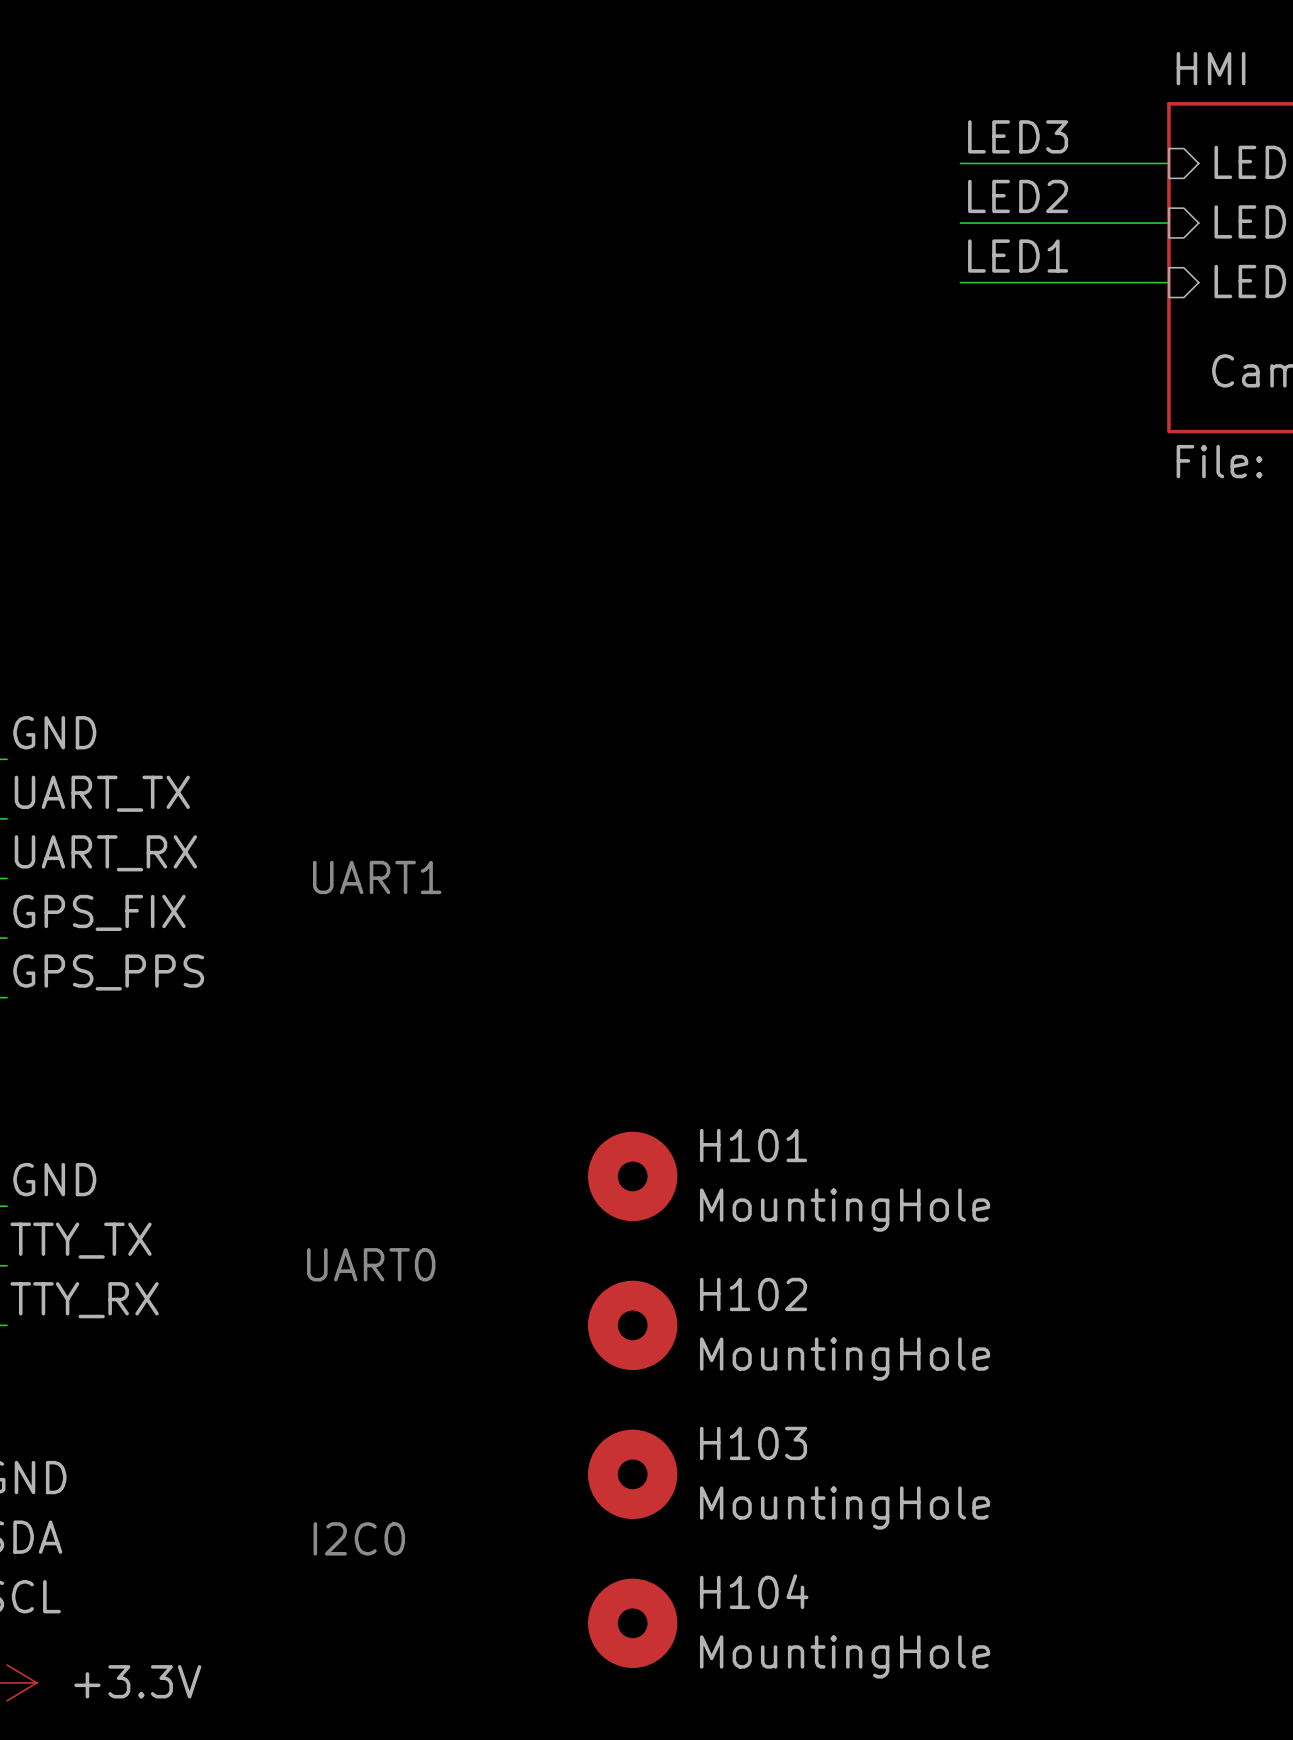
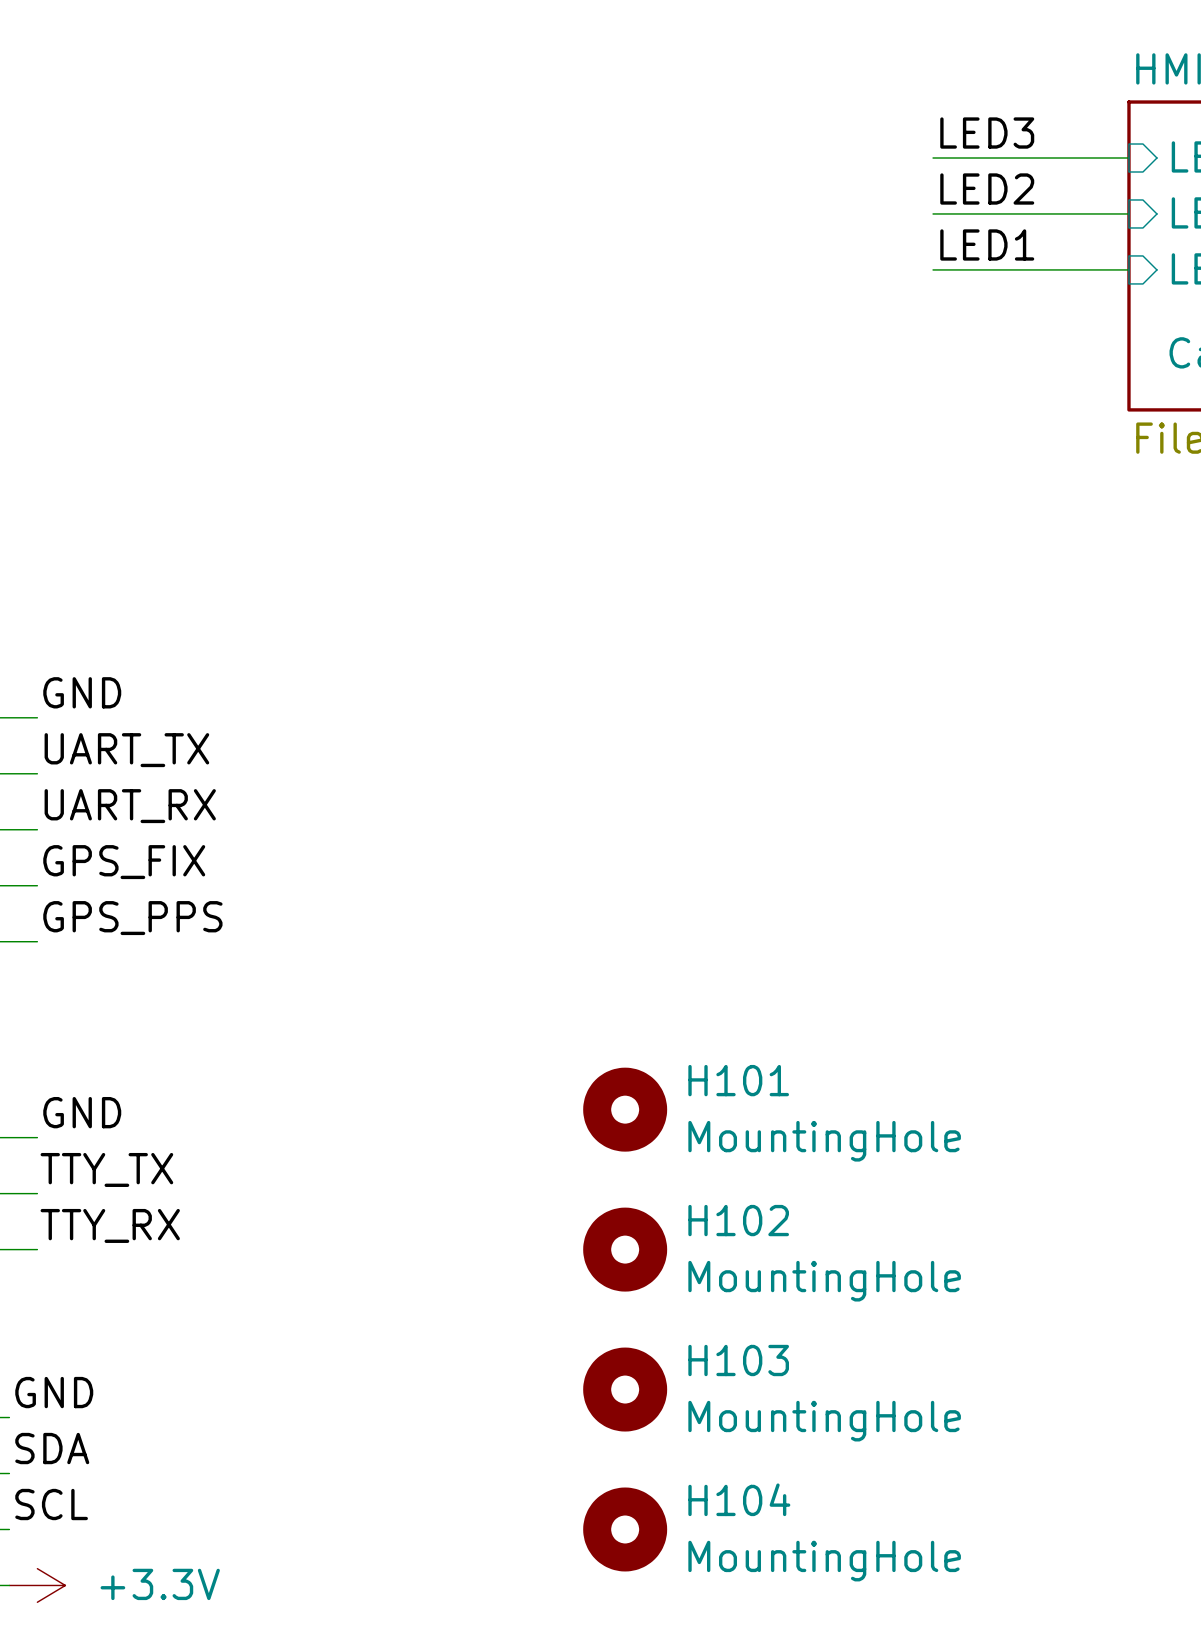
text: UART1 (377, 877) -> none
text: UART0 (371, 1264) -> none
text: I2C0 (359, 1538) -> none

